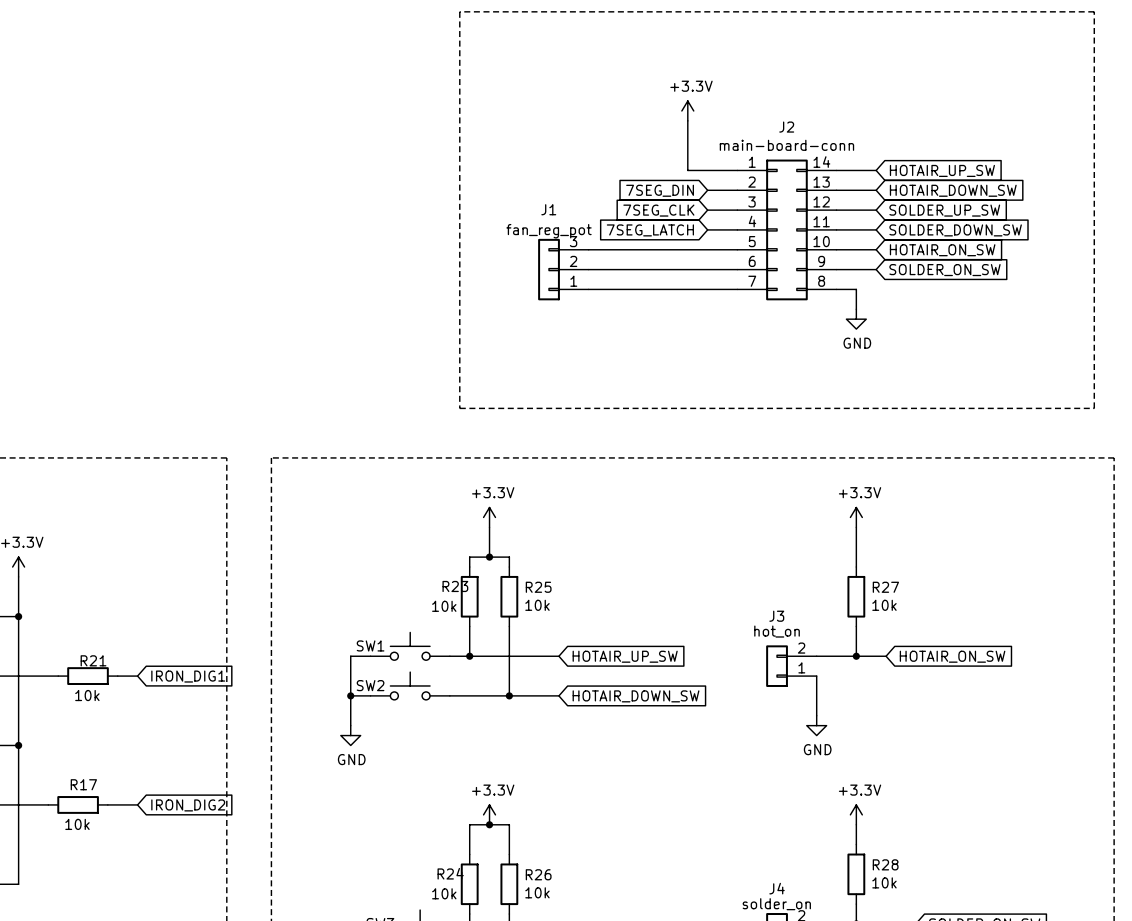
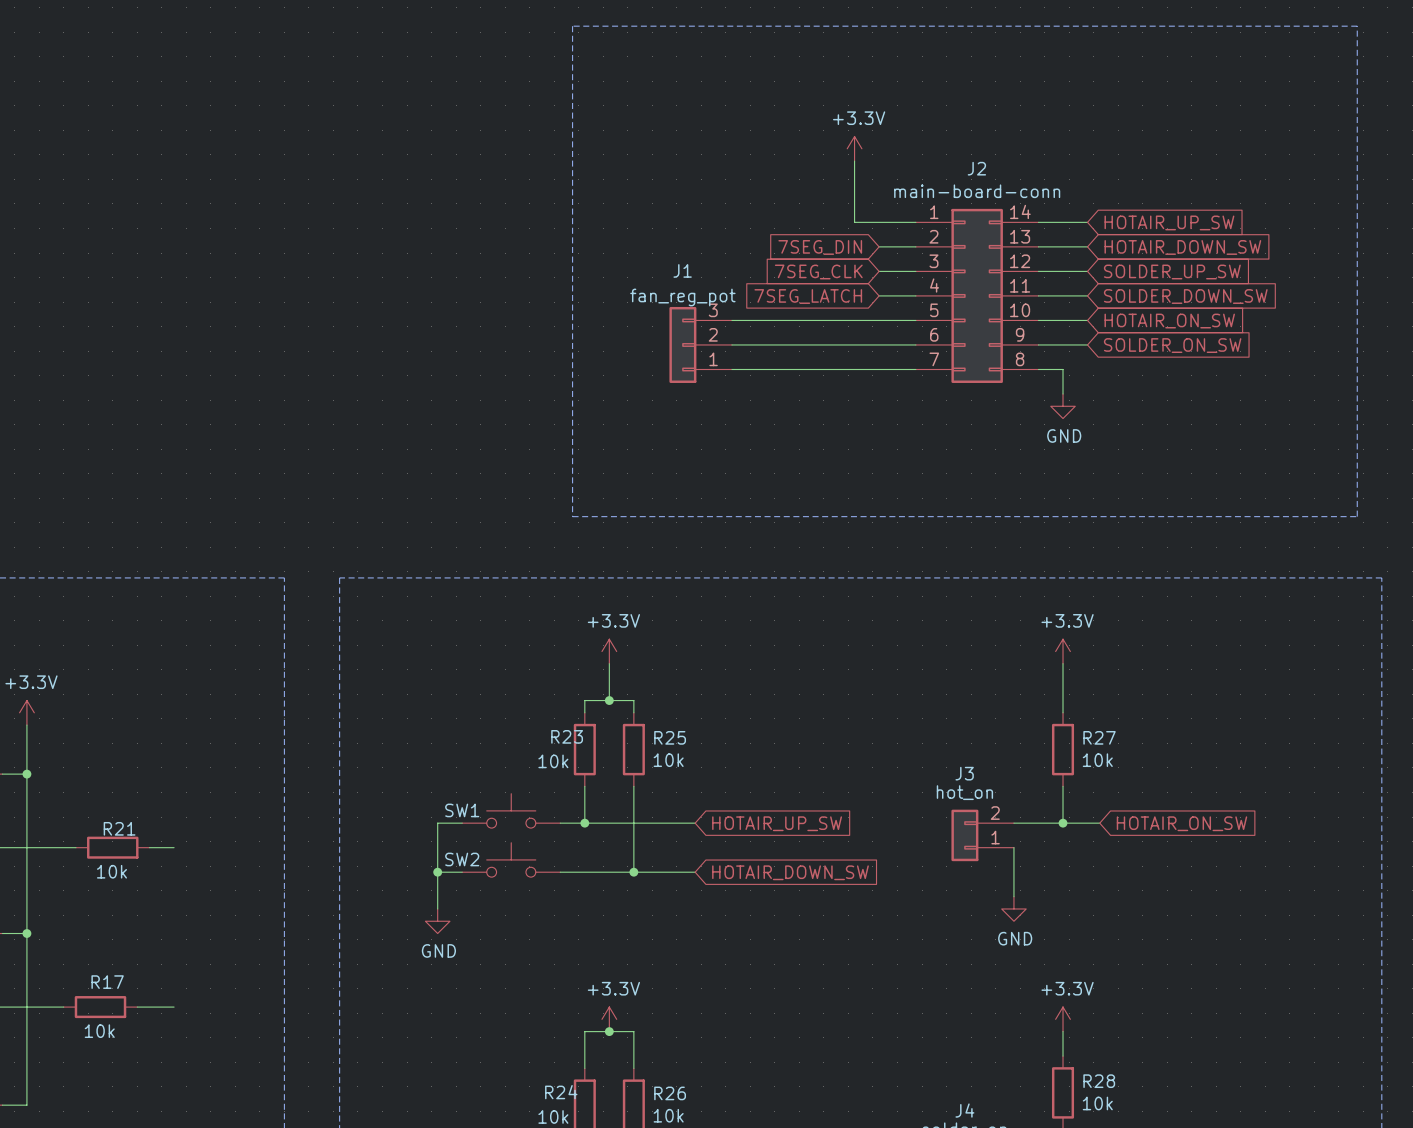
global label: IRON_DIG1 (188, 676) -> none
global label: IRON_DIG2 (188, 805) -> none

